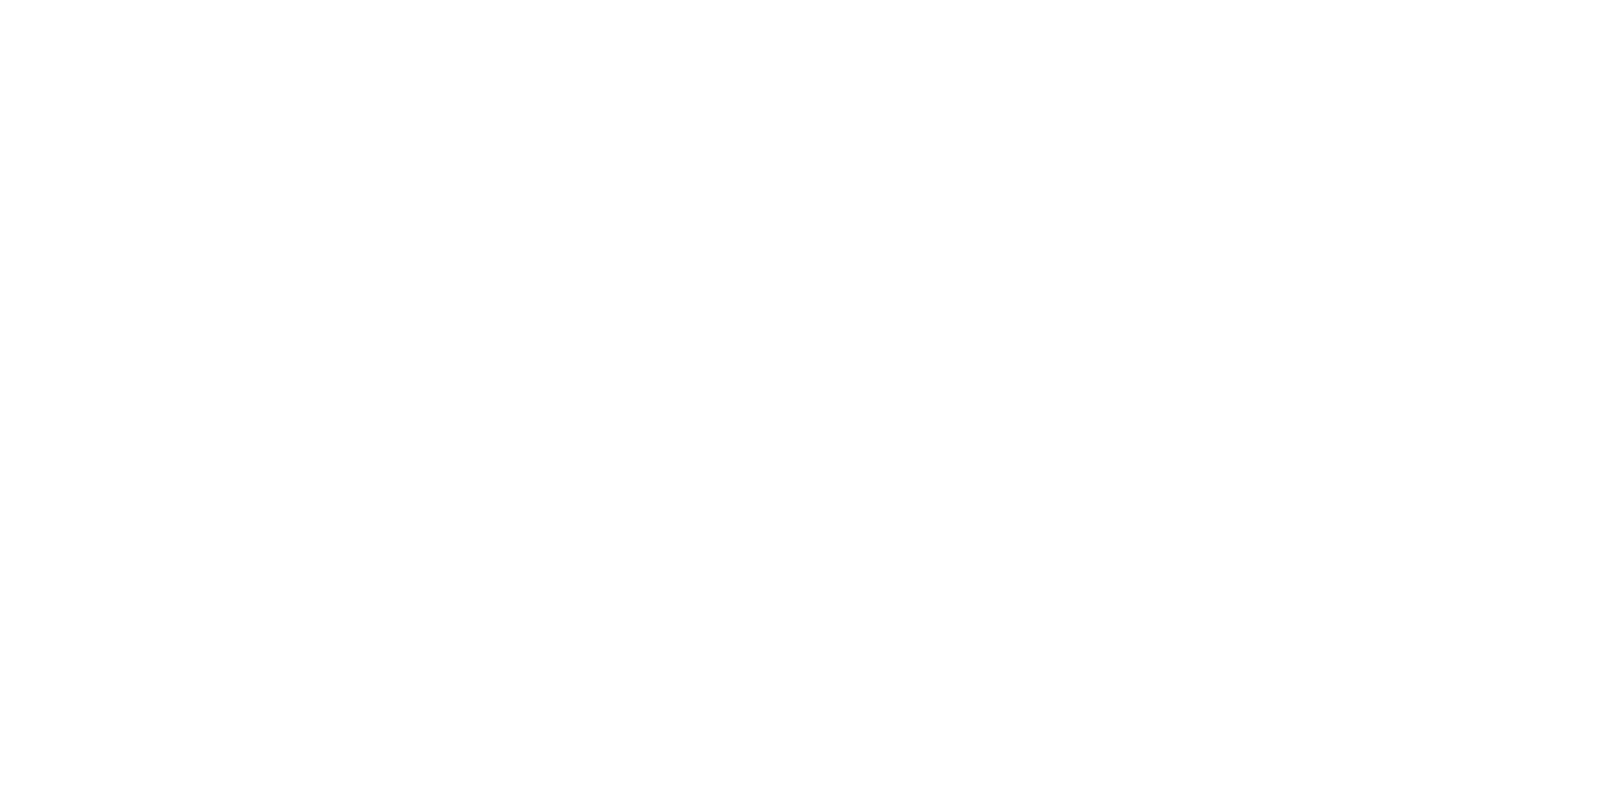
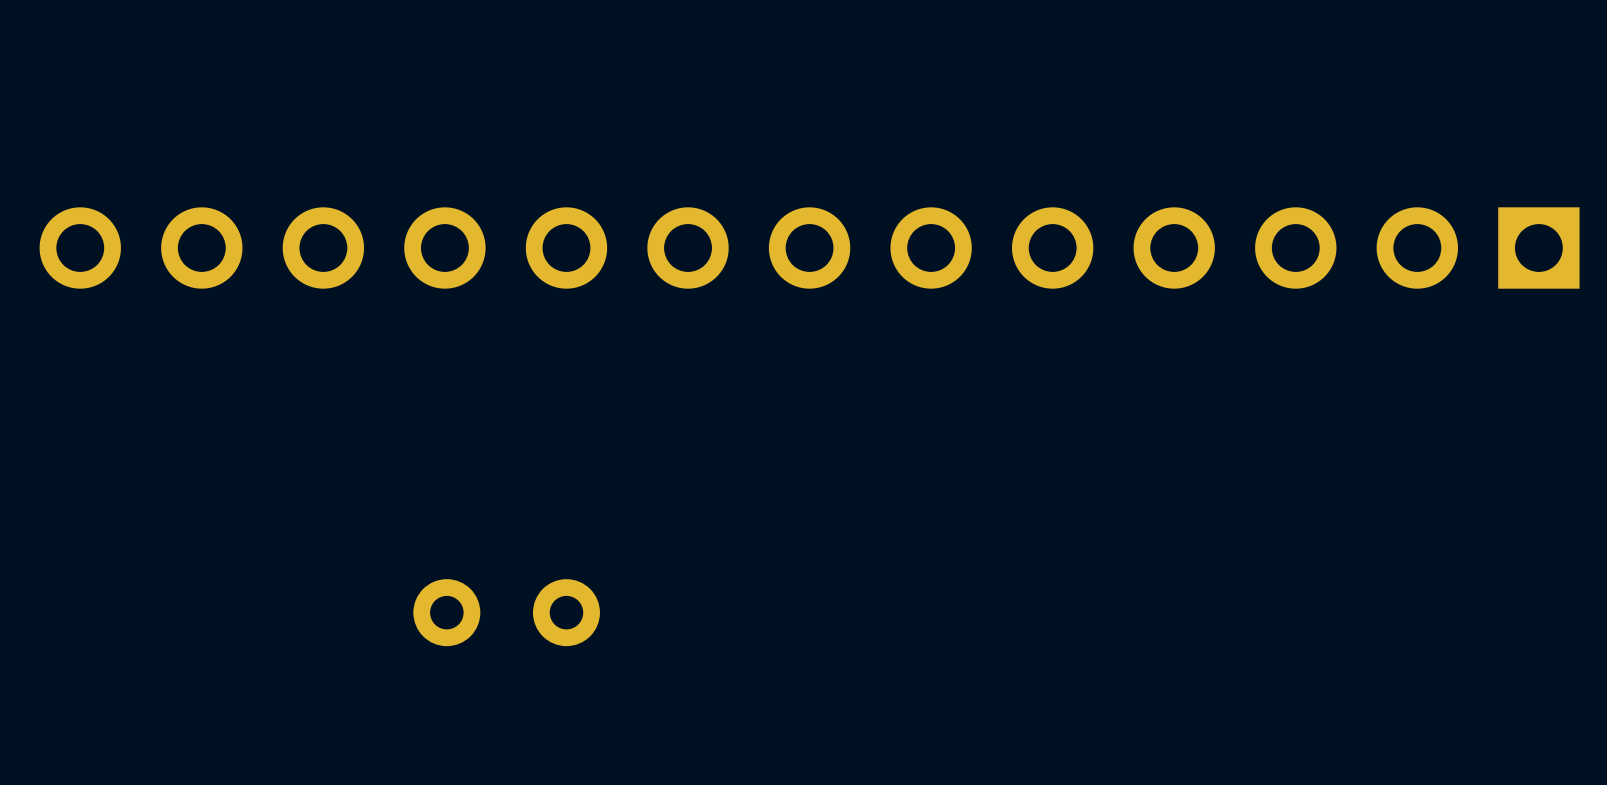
part: none -> (809, 248)
part: none -> (506, 612)

